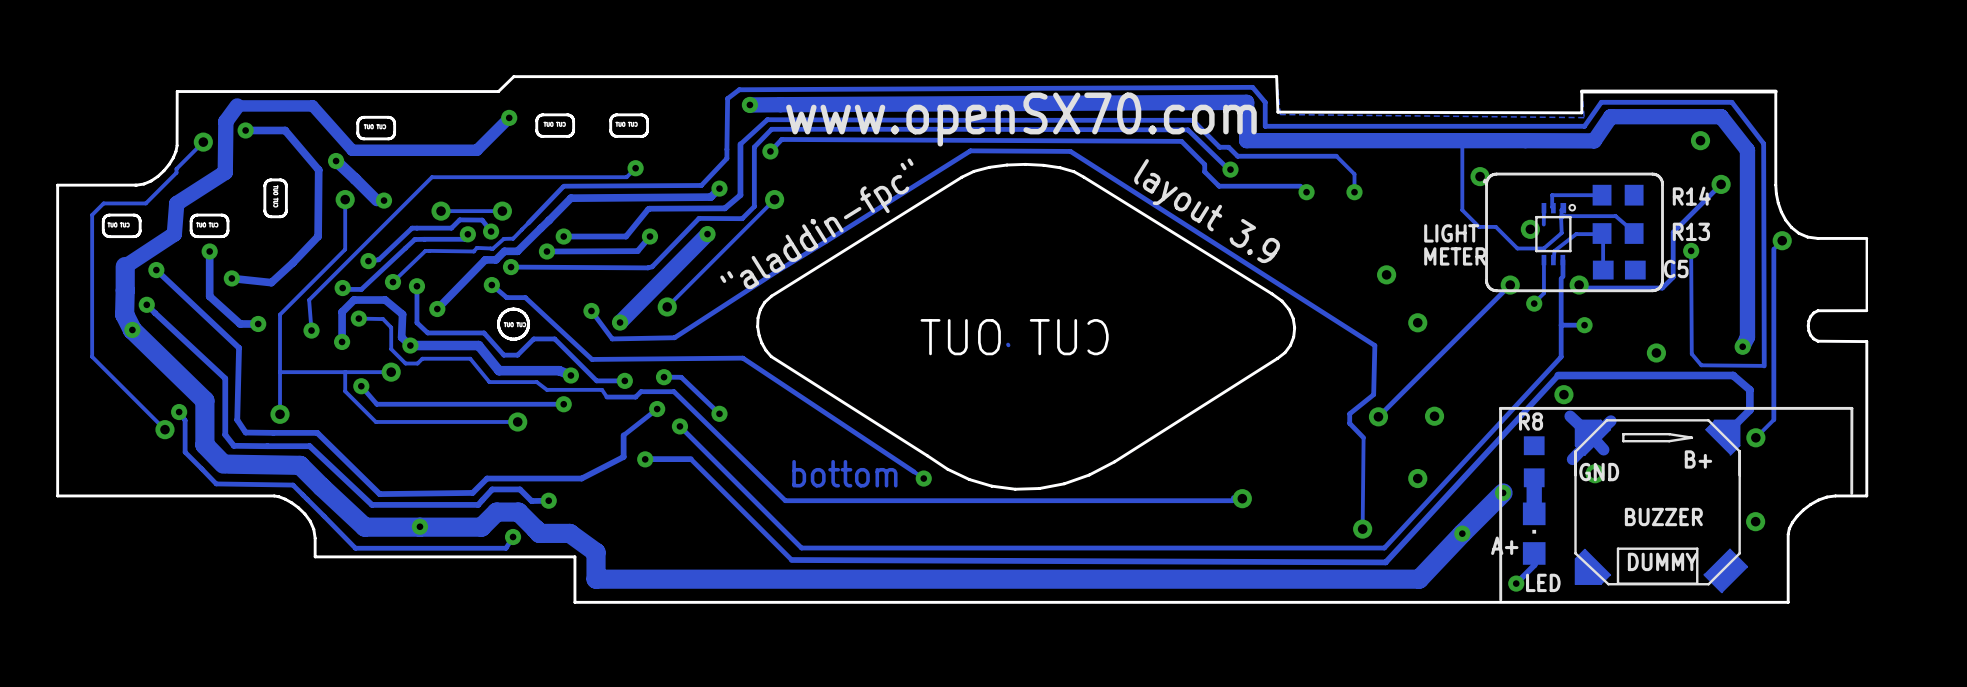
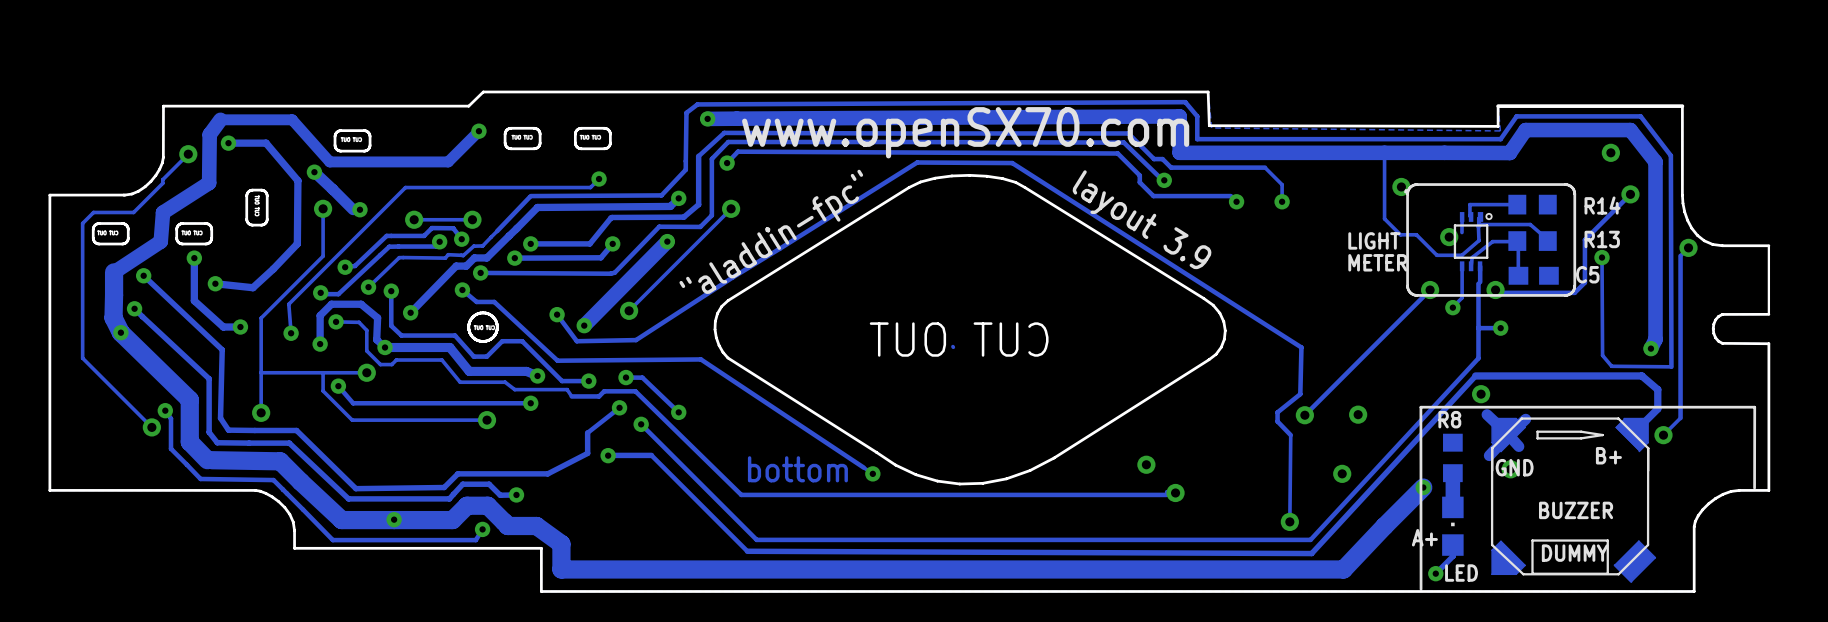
via: (1386, 274) -> none
via: (1417, 322) -> none
via: (1656, 352) -> none
via: none -> (1146, 464)
via: (1755, 521) -> none
via: (1462, 533) -> none

